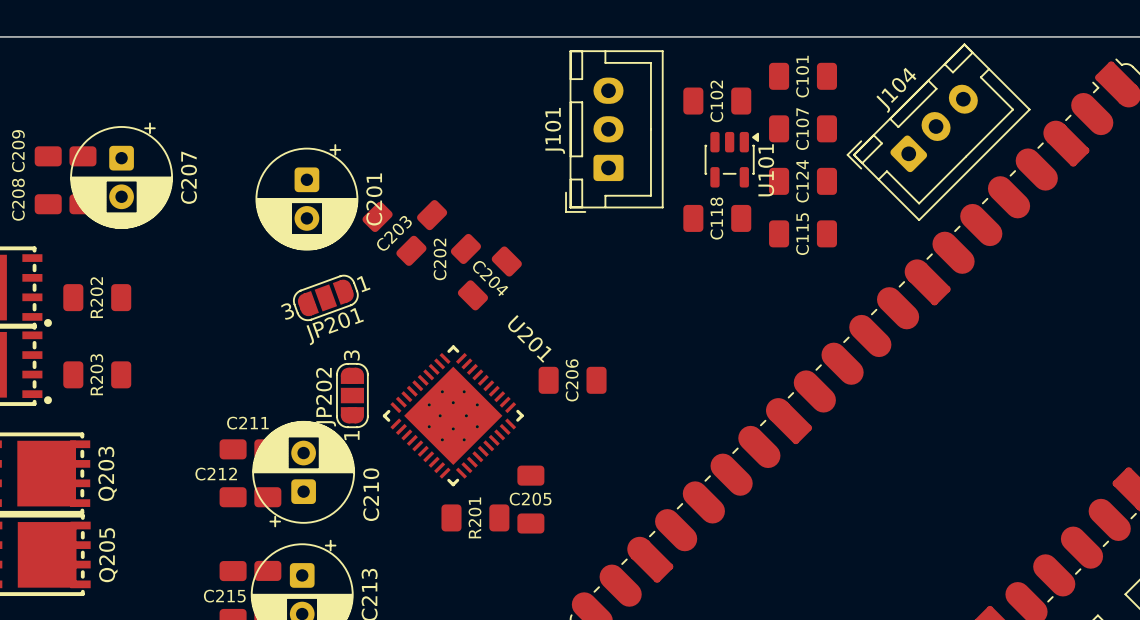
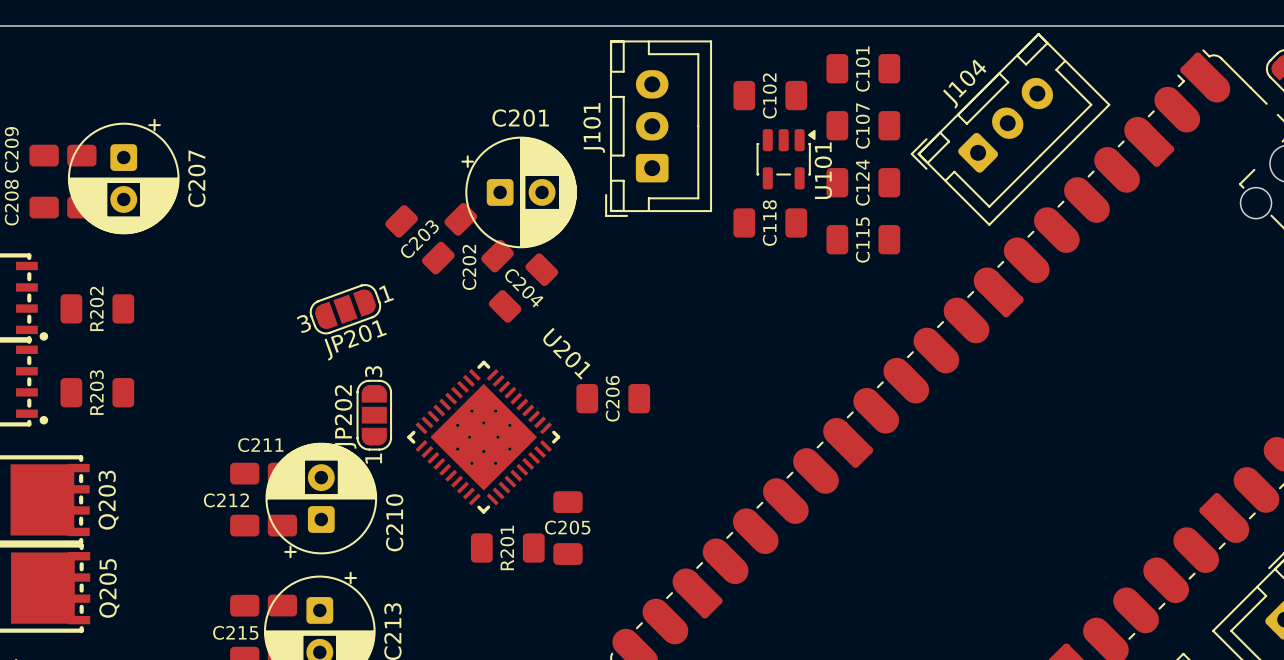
C201 rotation: 0° (306, 197) -> 90° counterclockwise (519, 192)
C201 position: (306, 197) -> (519, 192)

